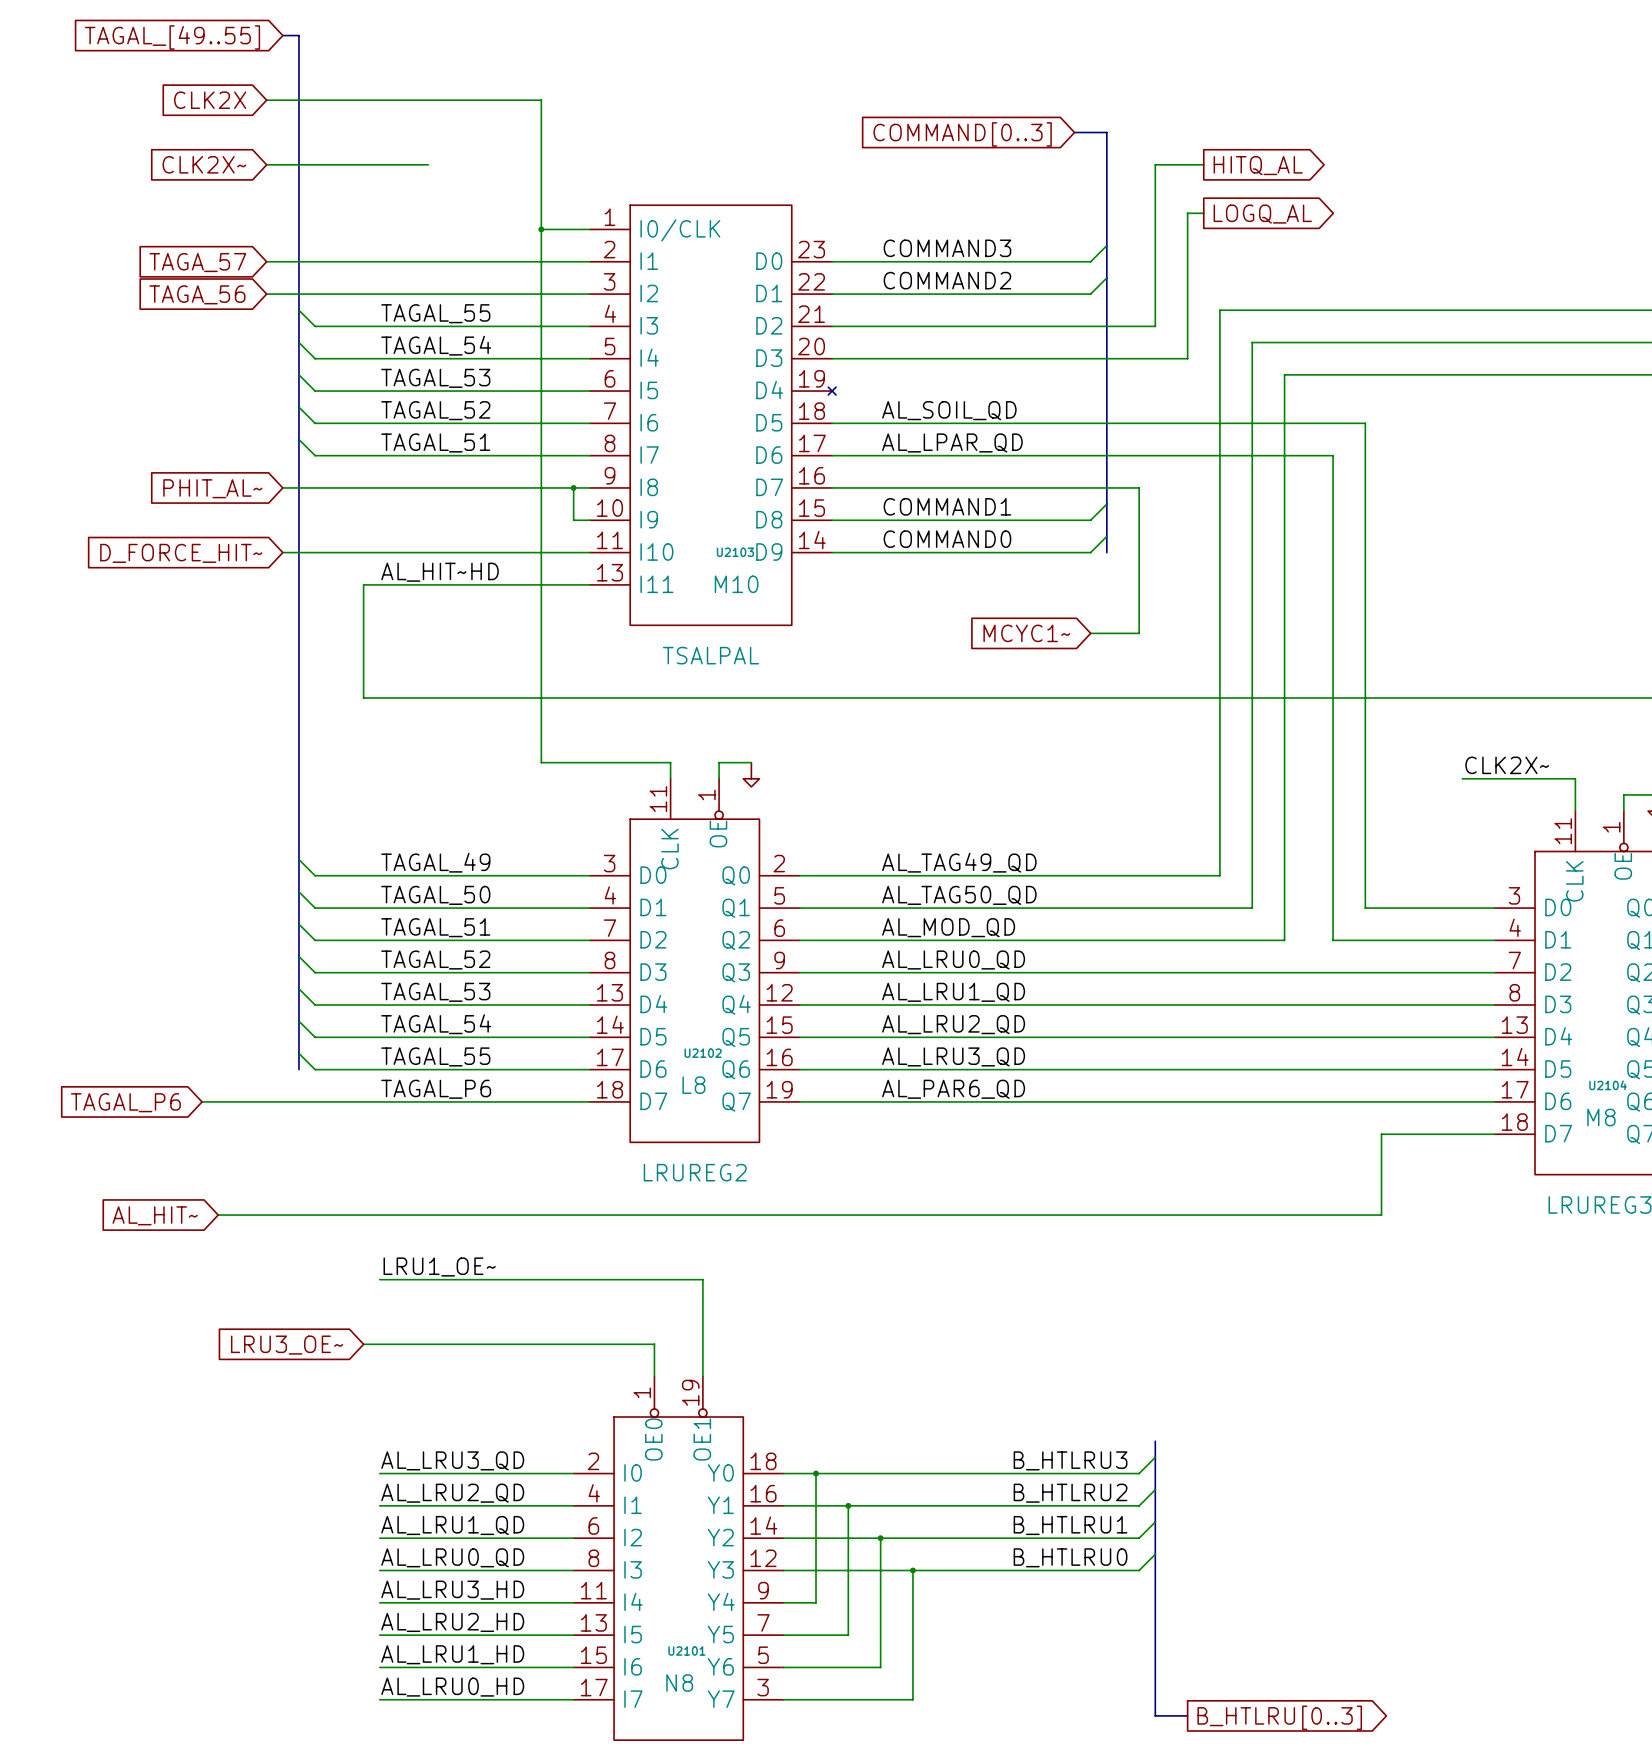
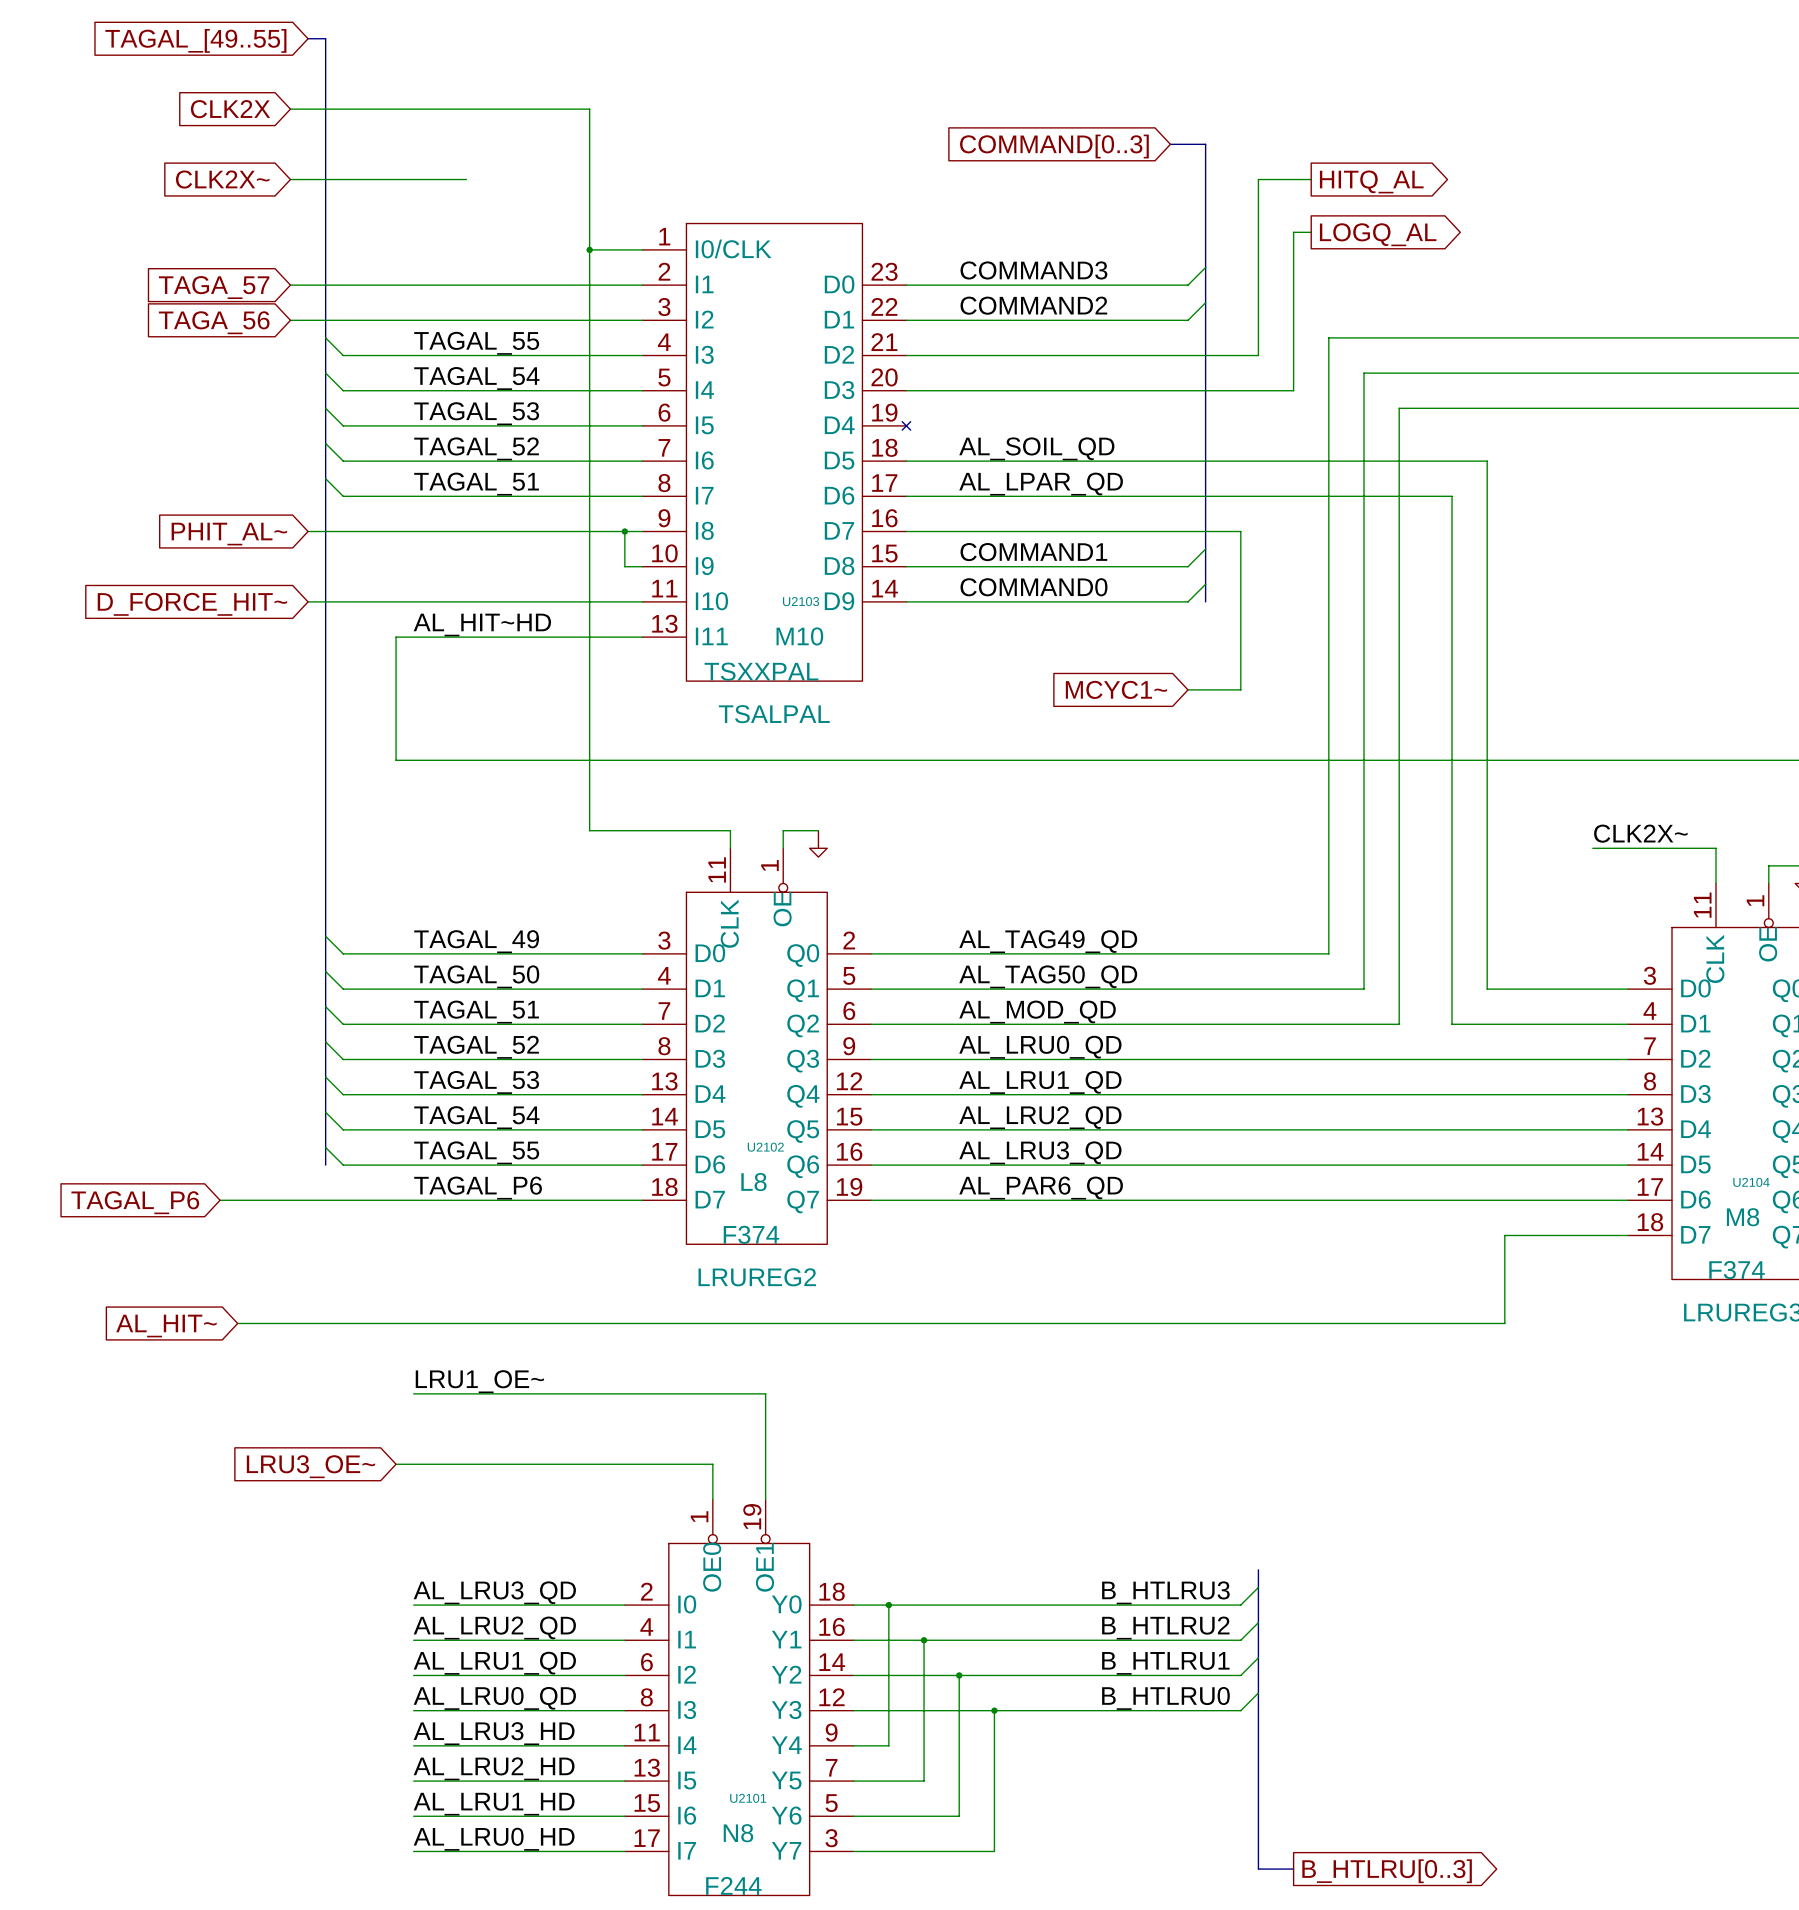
U2103 value: none -> TSXXPAL (761, 671)
U2102 value: none -> F374 (751, 1234)
U2104 value: none -> F374 (1737, 1270)
U2101 value: none -> F244 (733, 1885)

